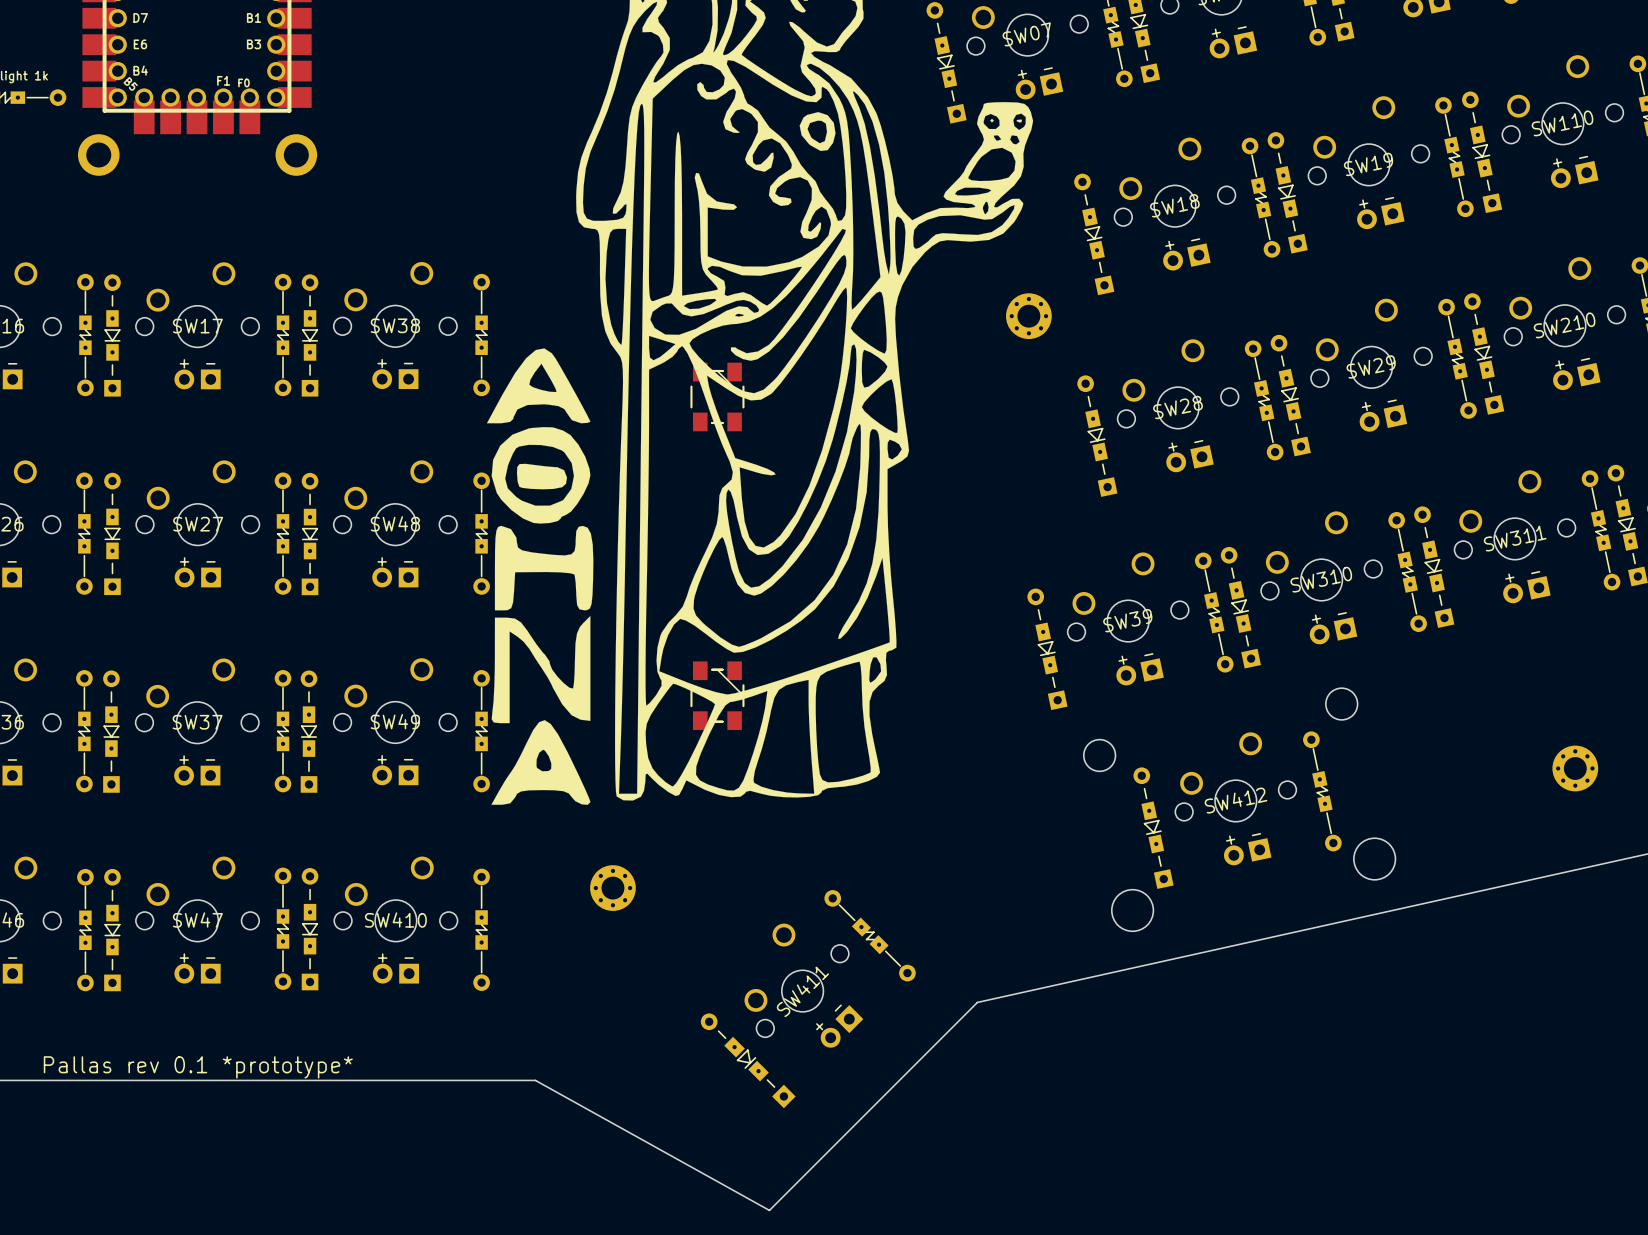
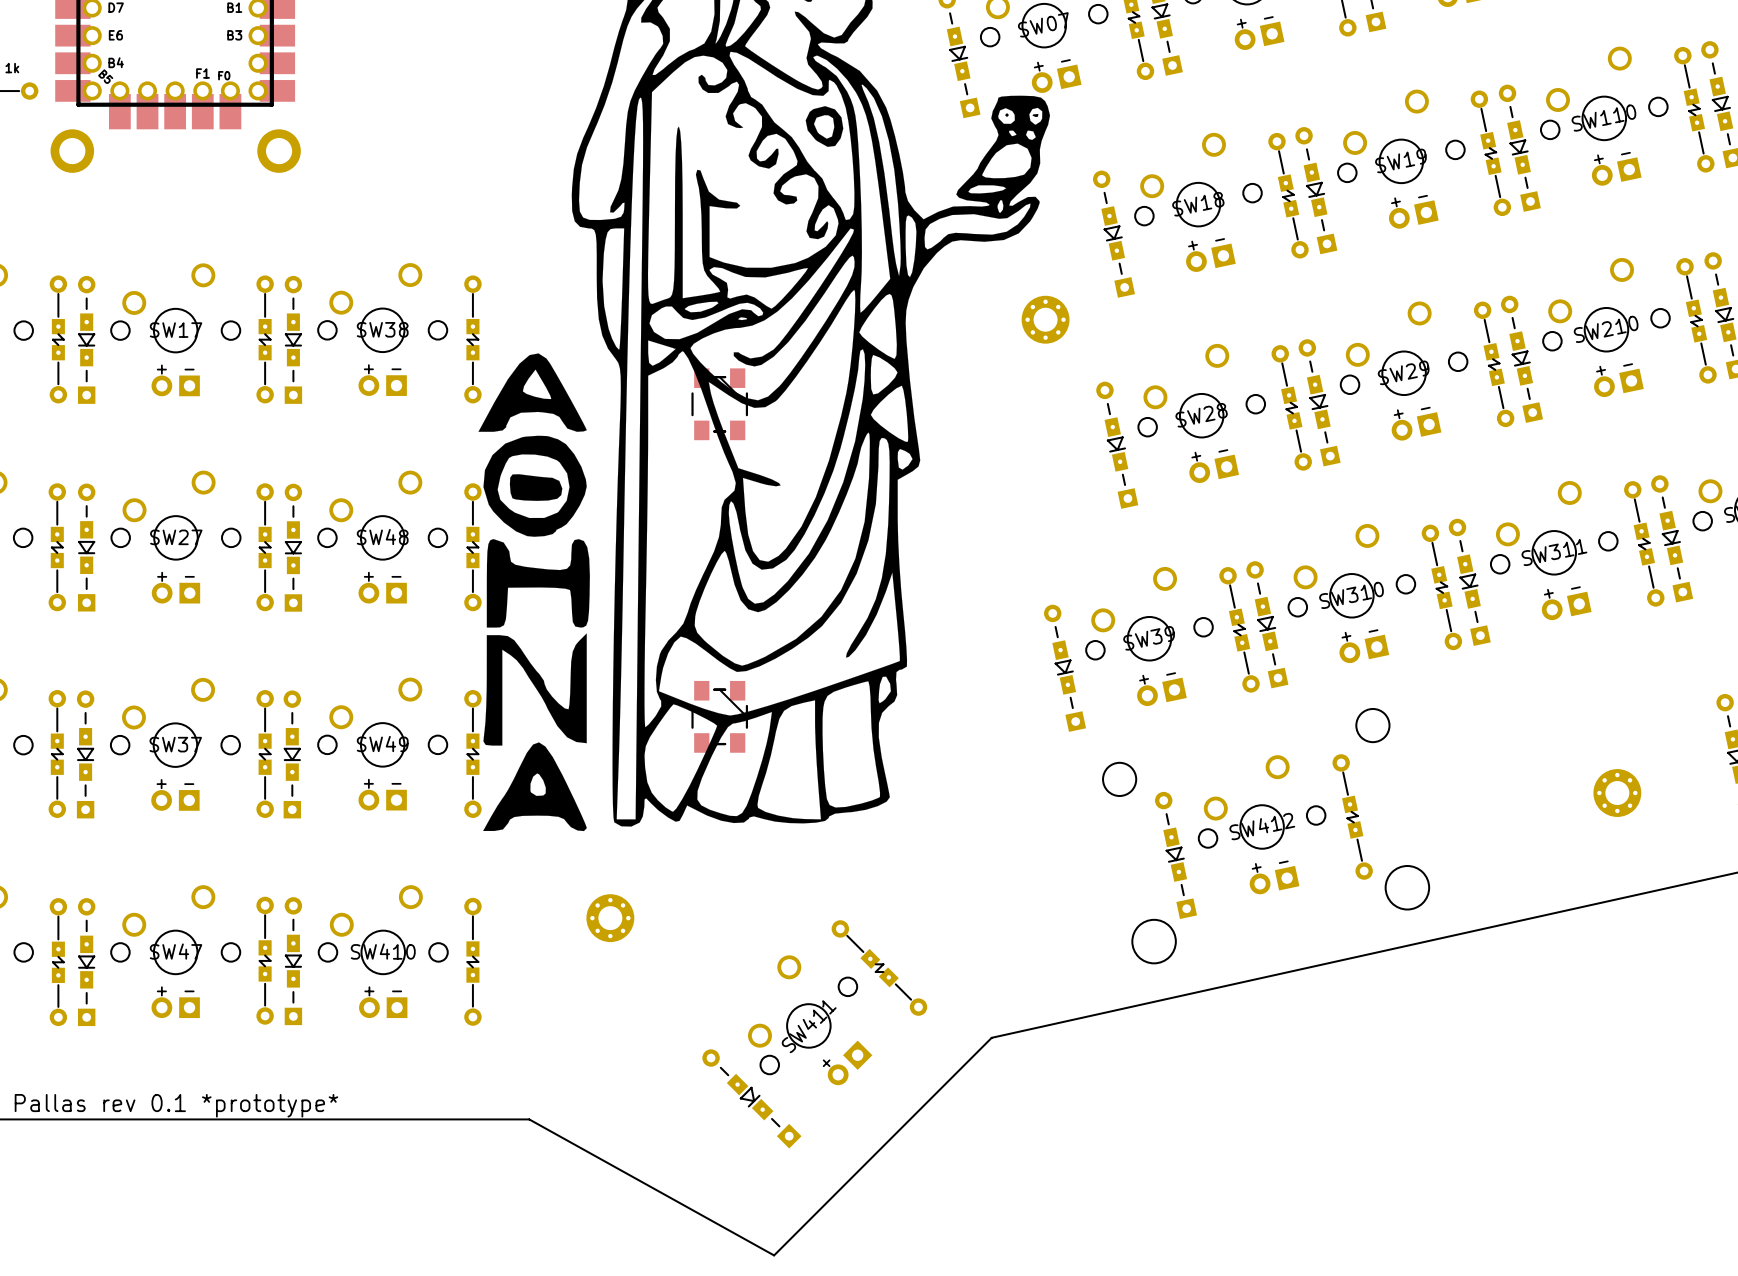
SW411 text: - (838, 1008) -> none

